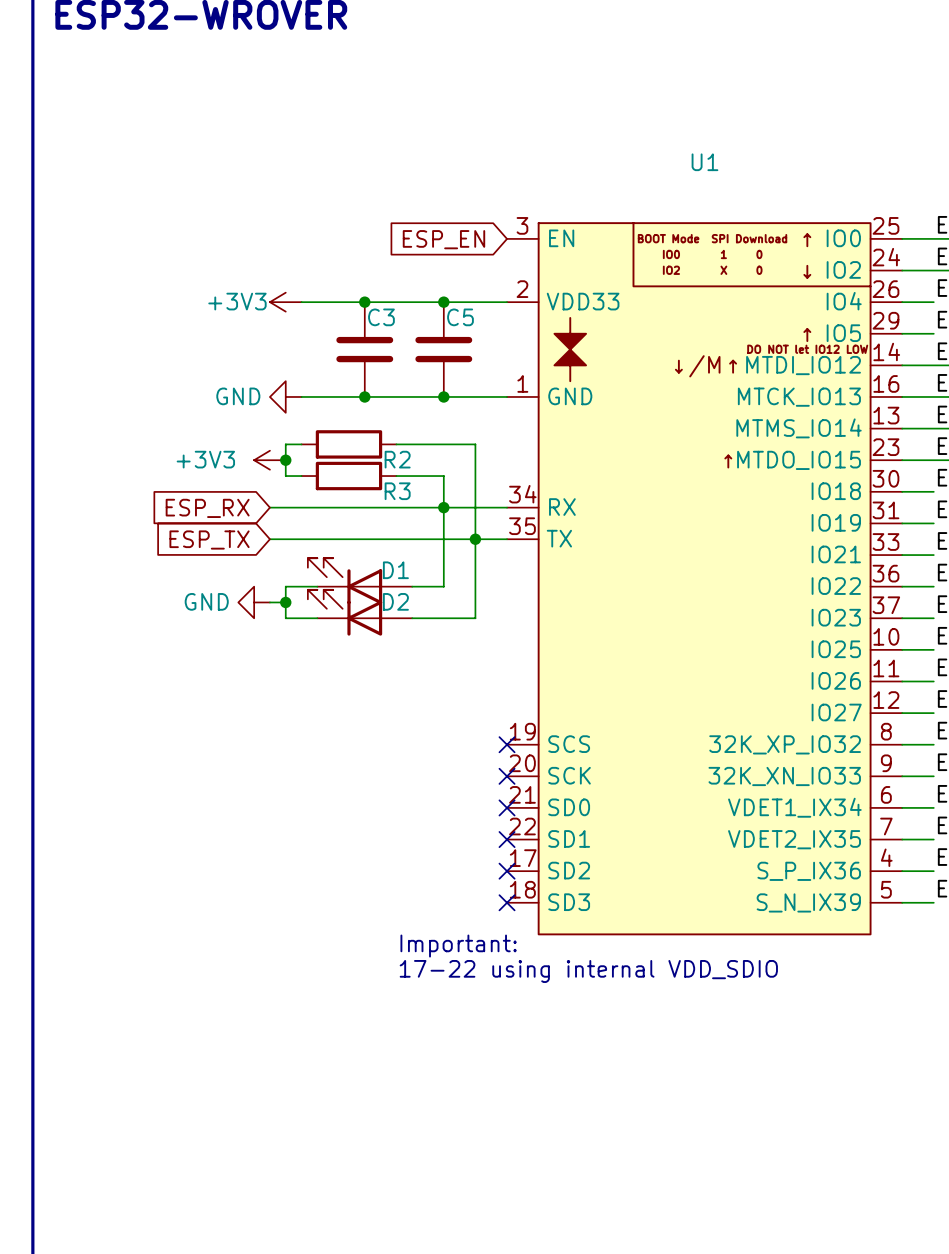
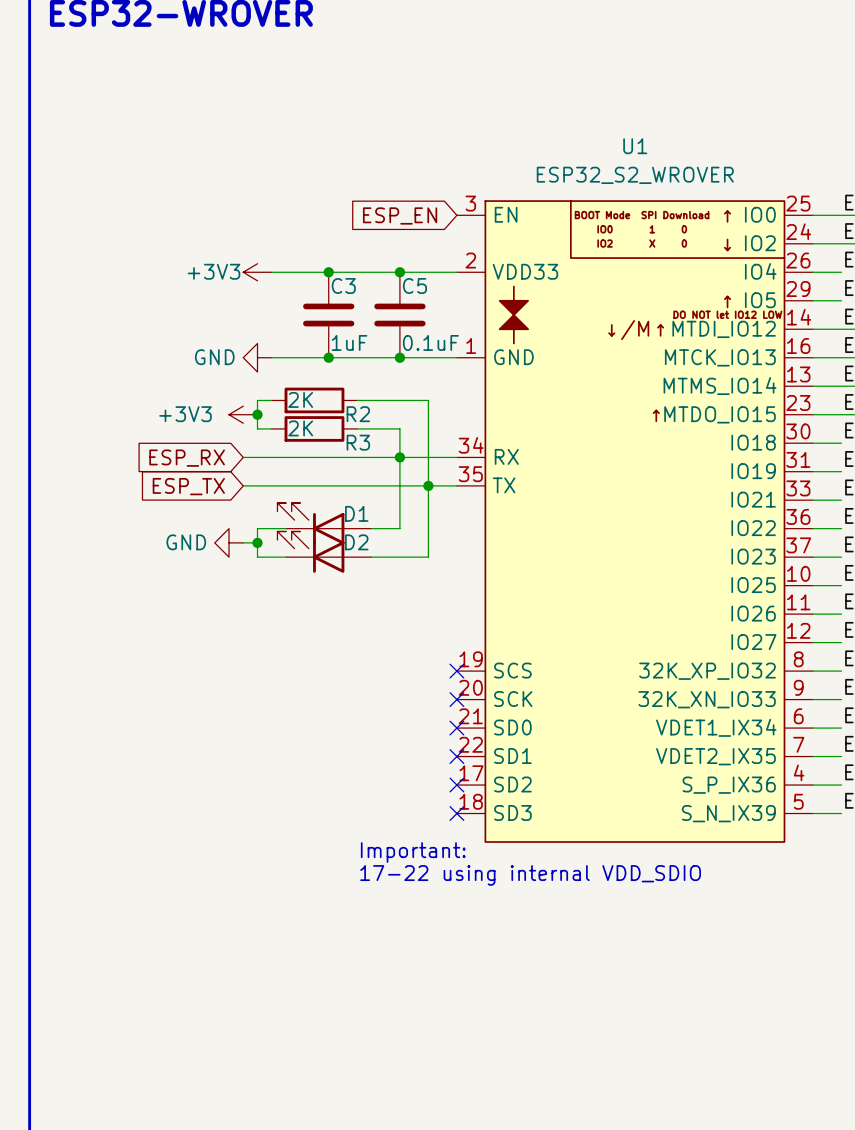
U1 value: none -> ESP32_S2_WROVER (635, 175)
C3 value: none -> 1uF (349, 342)
C5 value: none -> 0.1uF (430, 342)
R2 value: none -> 2K (300, 399)
R3 value: none -> 2K (300, 428)

